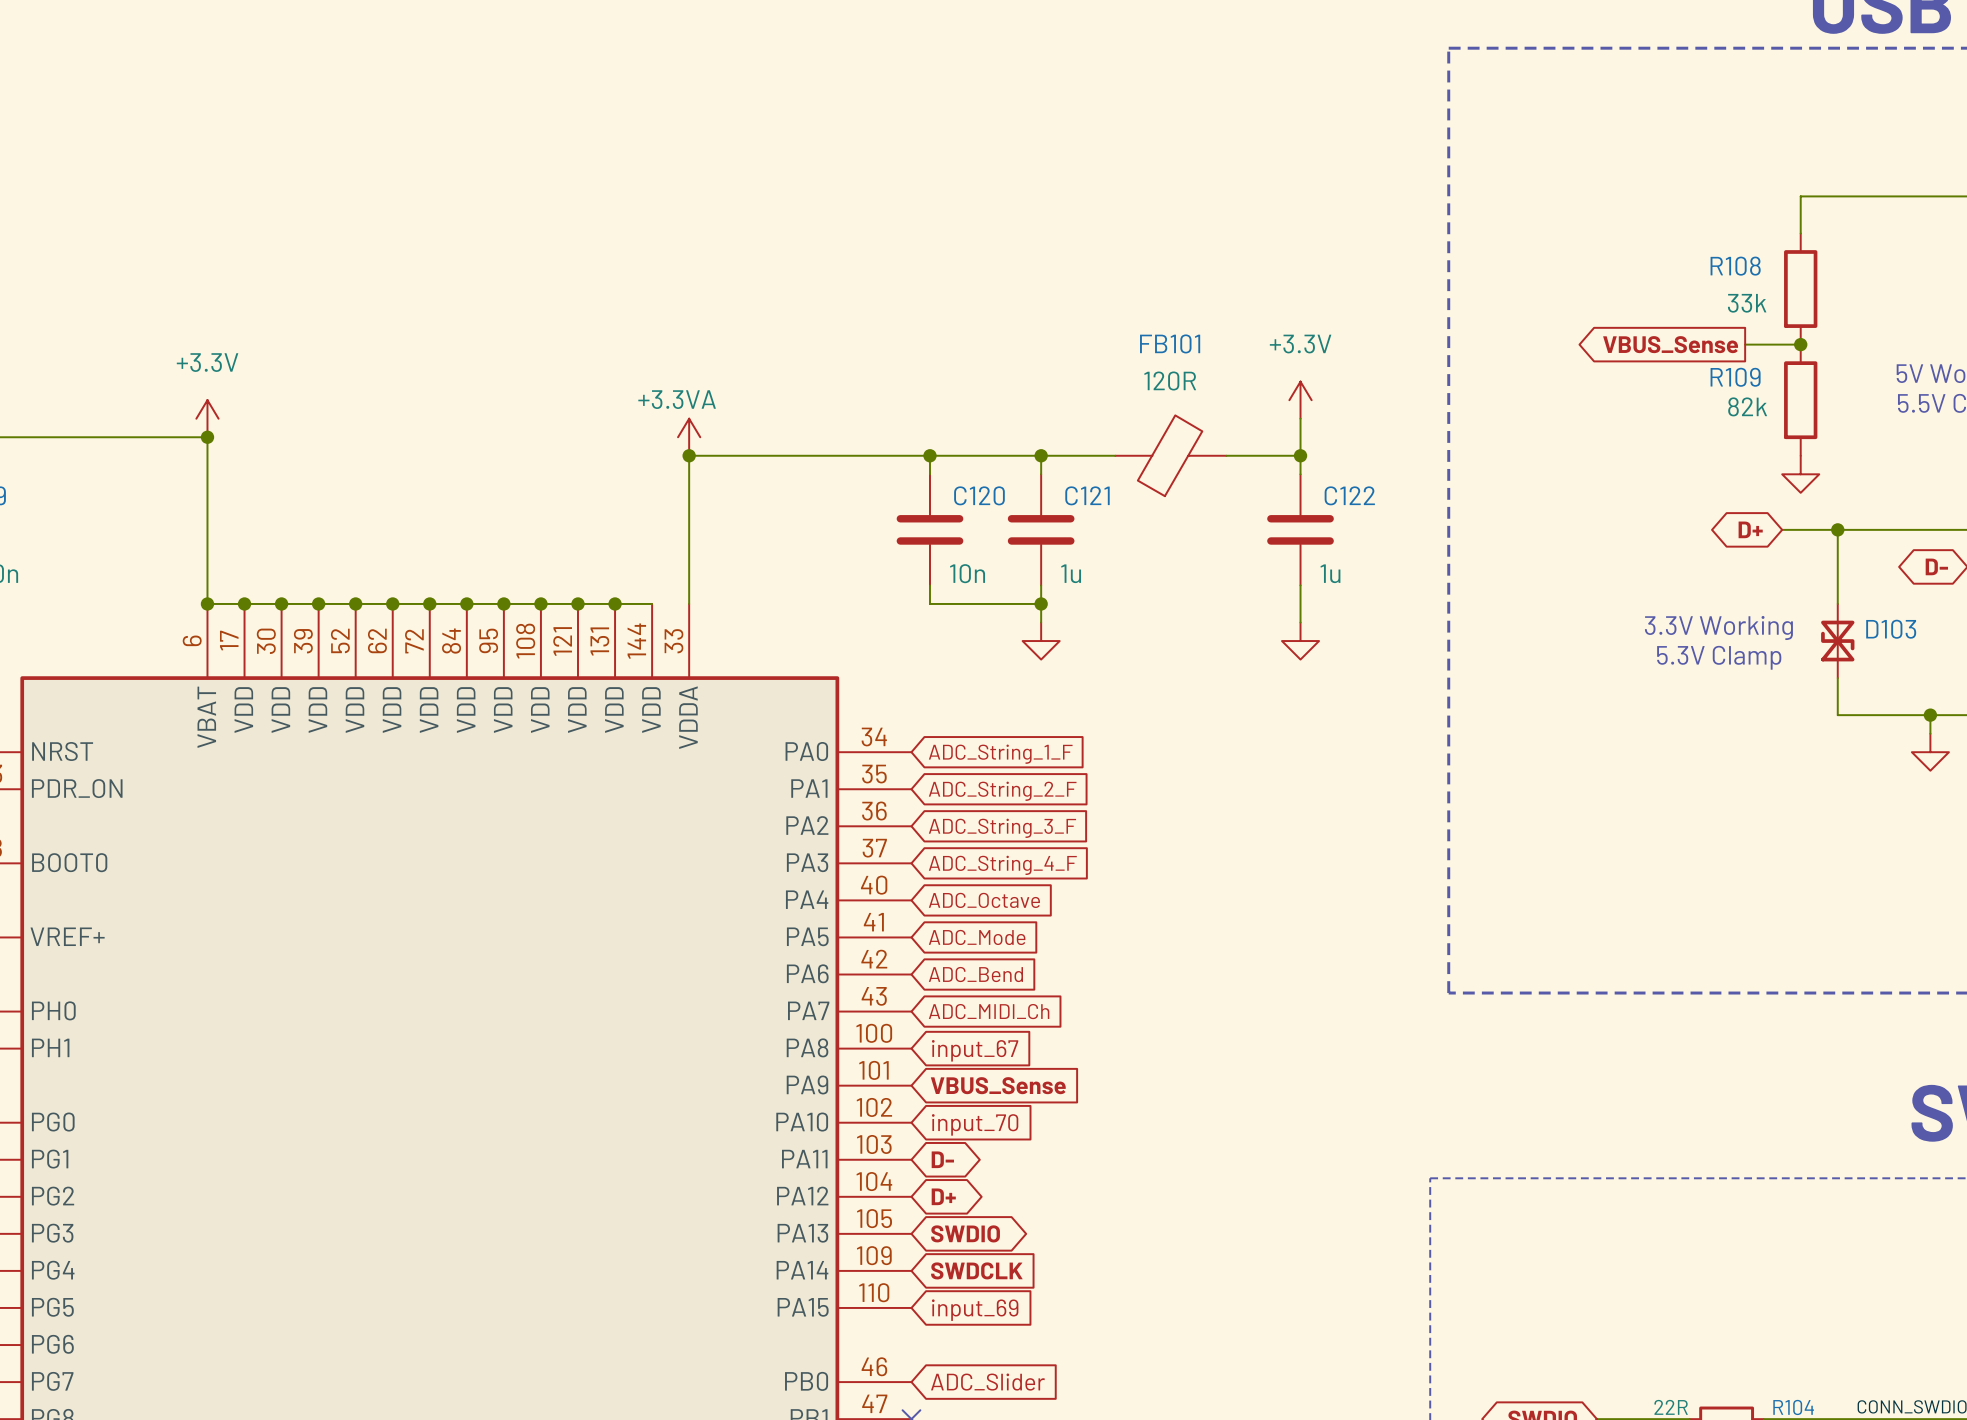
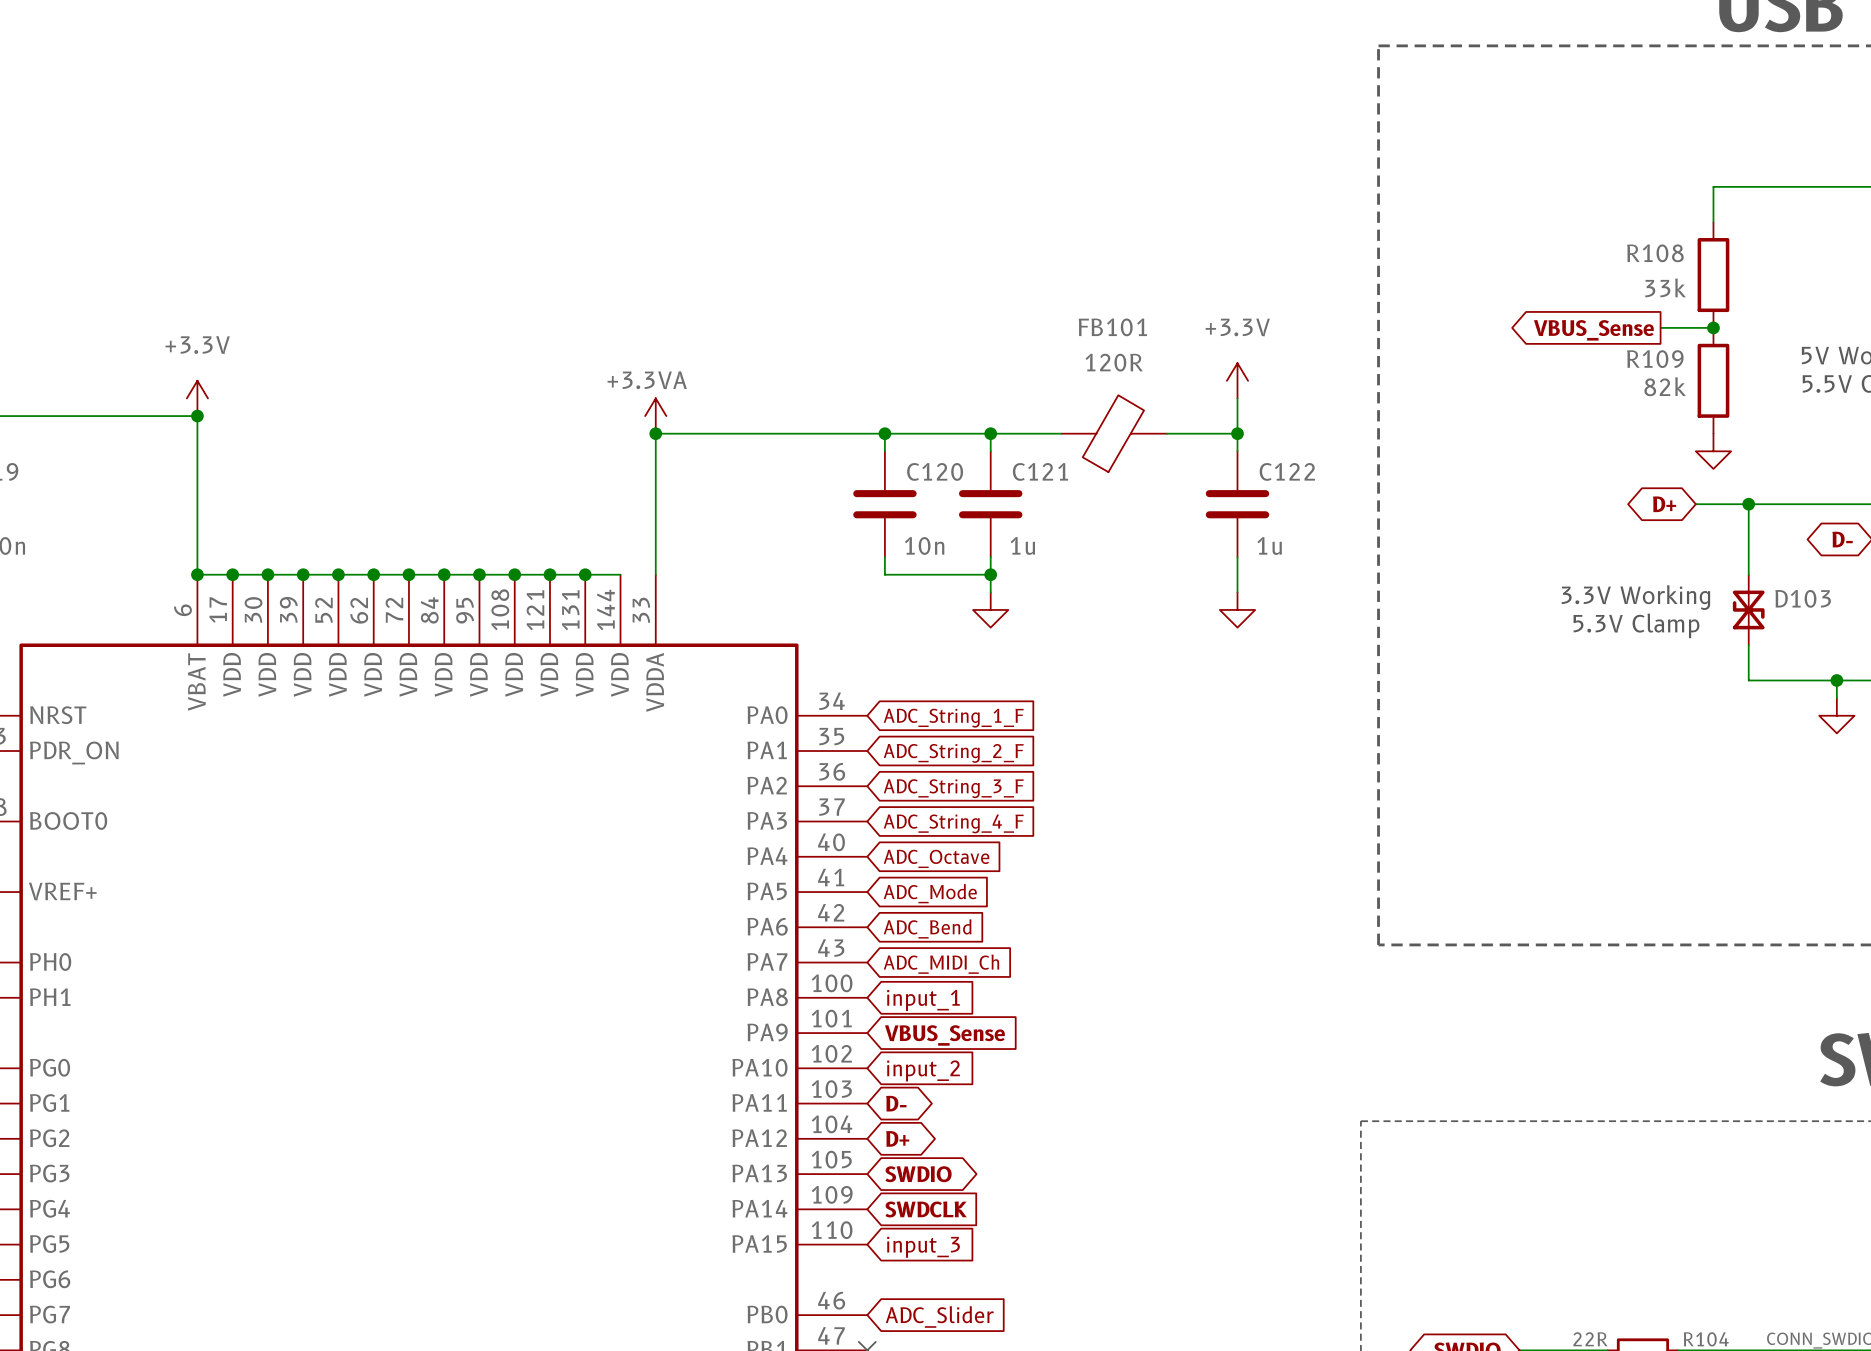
global label: input_67 (975, 1050) -> input_1 (923, 1000)
global label: input_70 (975, 1124) -> input_2 (923, 1070)
global label: input_69 (975, 1310) -> input_3 (923, 1247)

